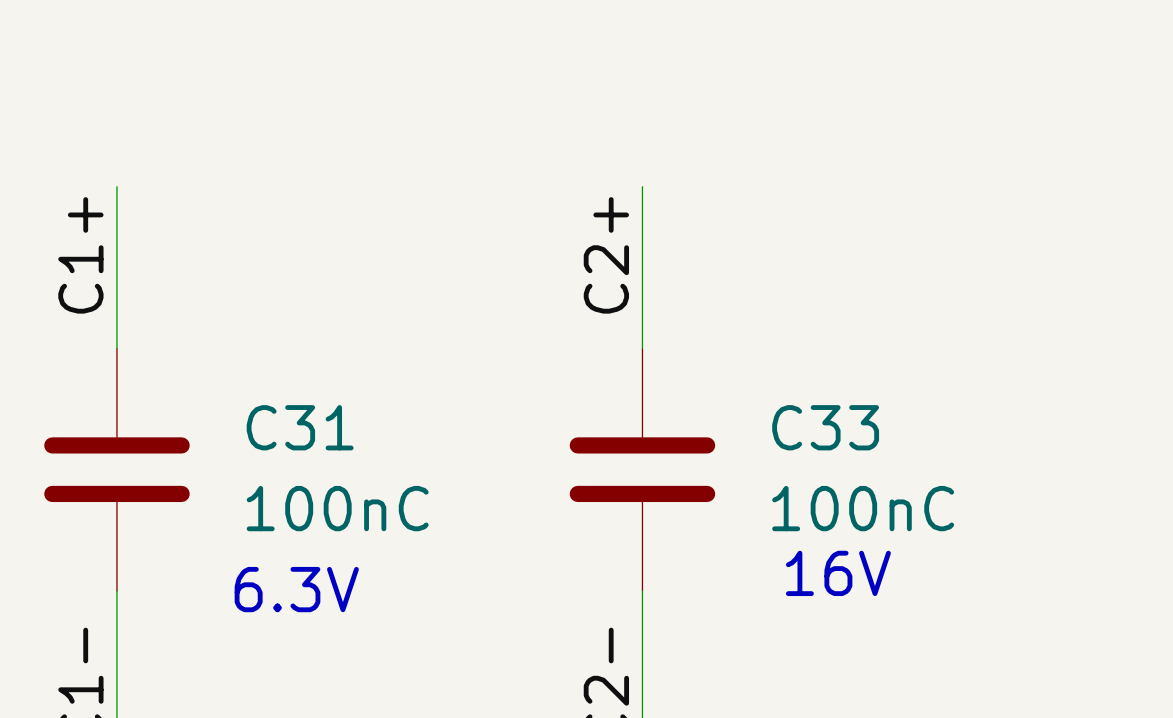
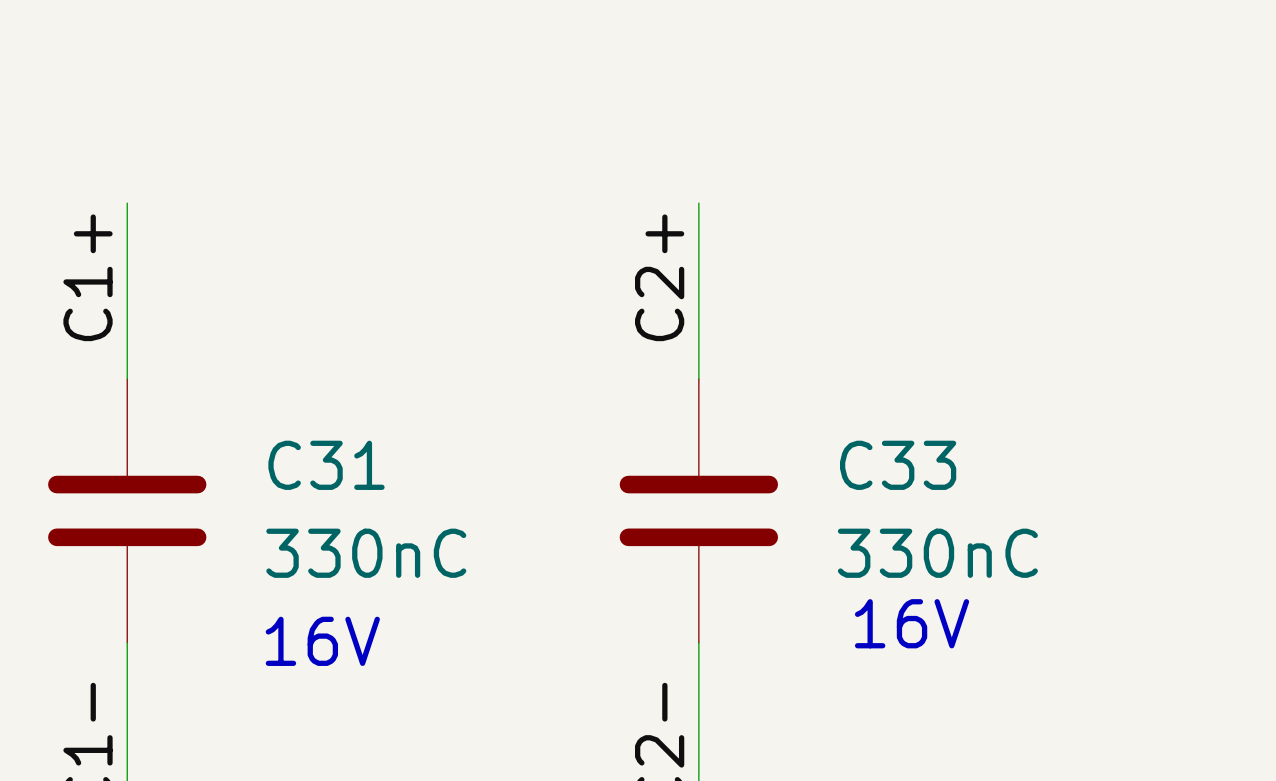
C31 value: 100nC (337, 508) -> 330nC (366, 553)
C33 value: 100nC (863, 508) -> 330nC (937, 553)
text: 6.3V (296, 589) -> 16V (322, 641)

